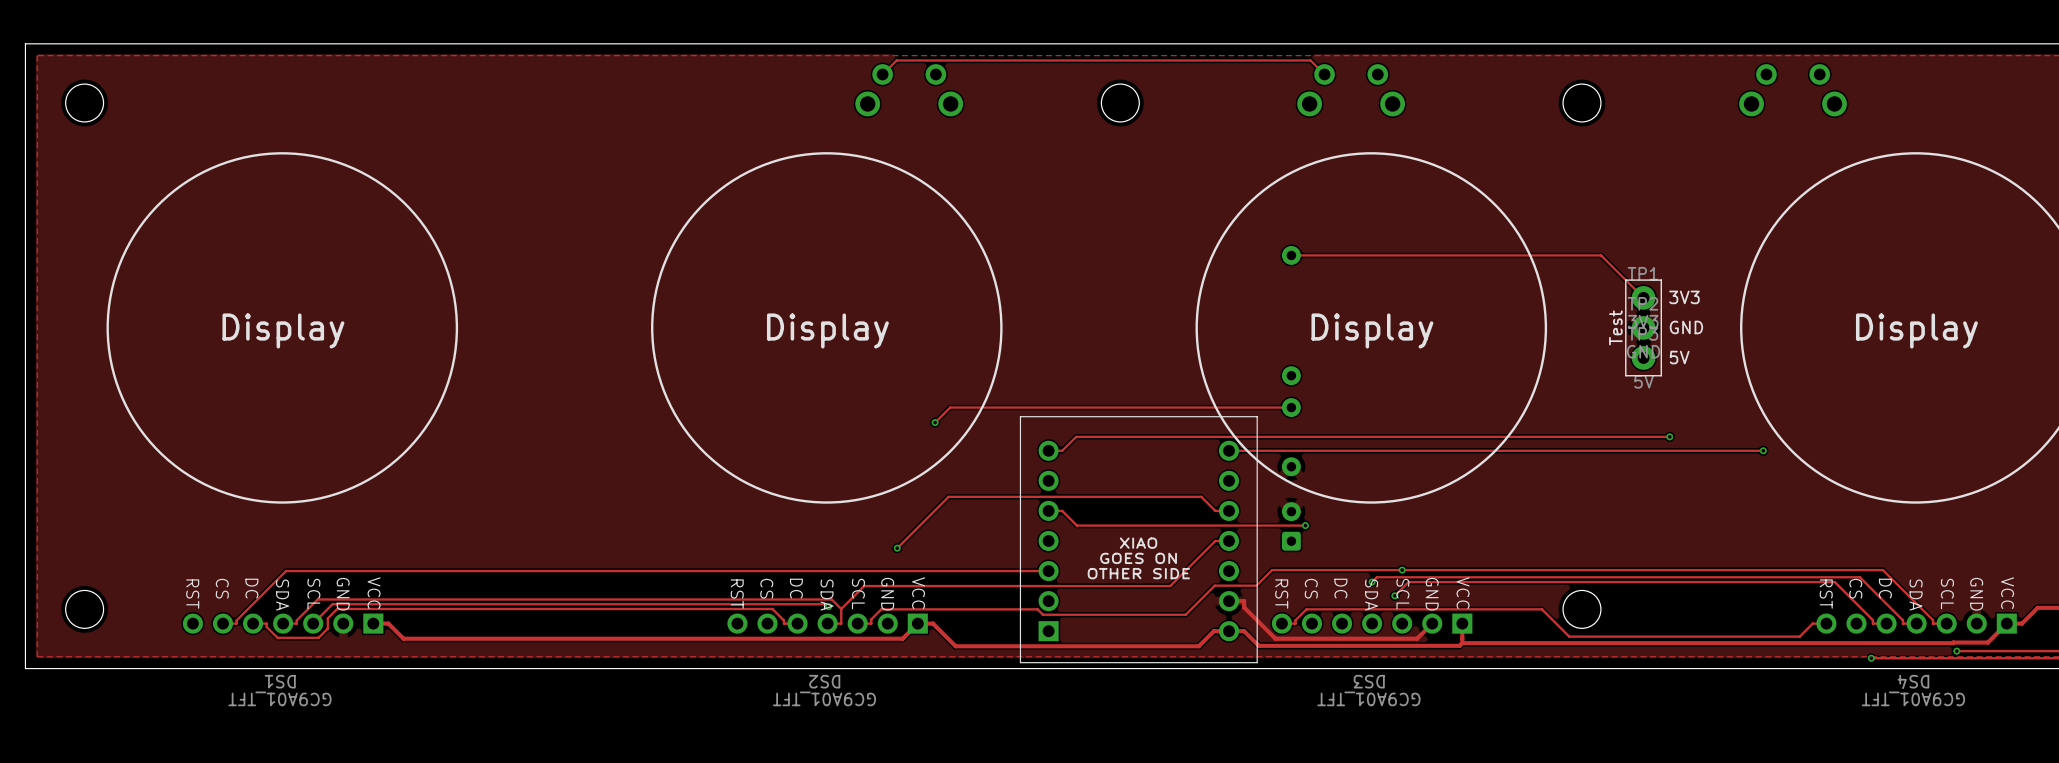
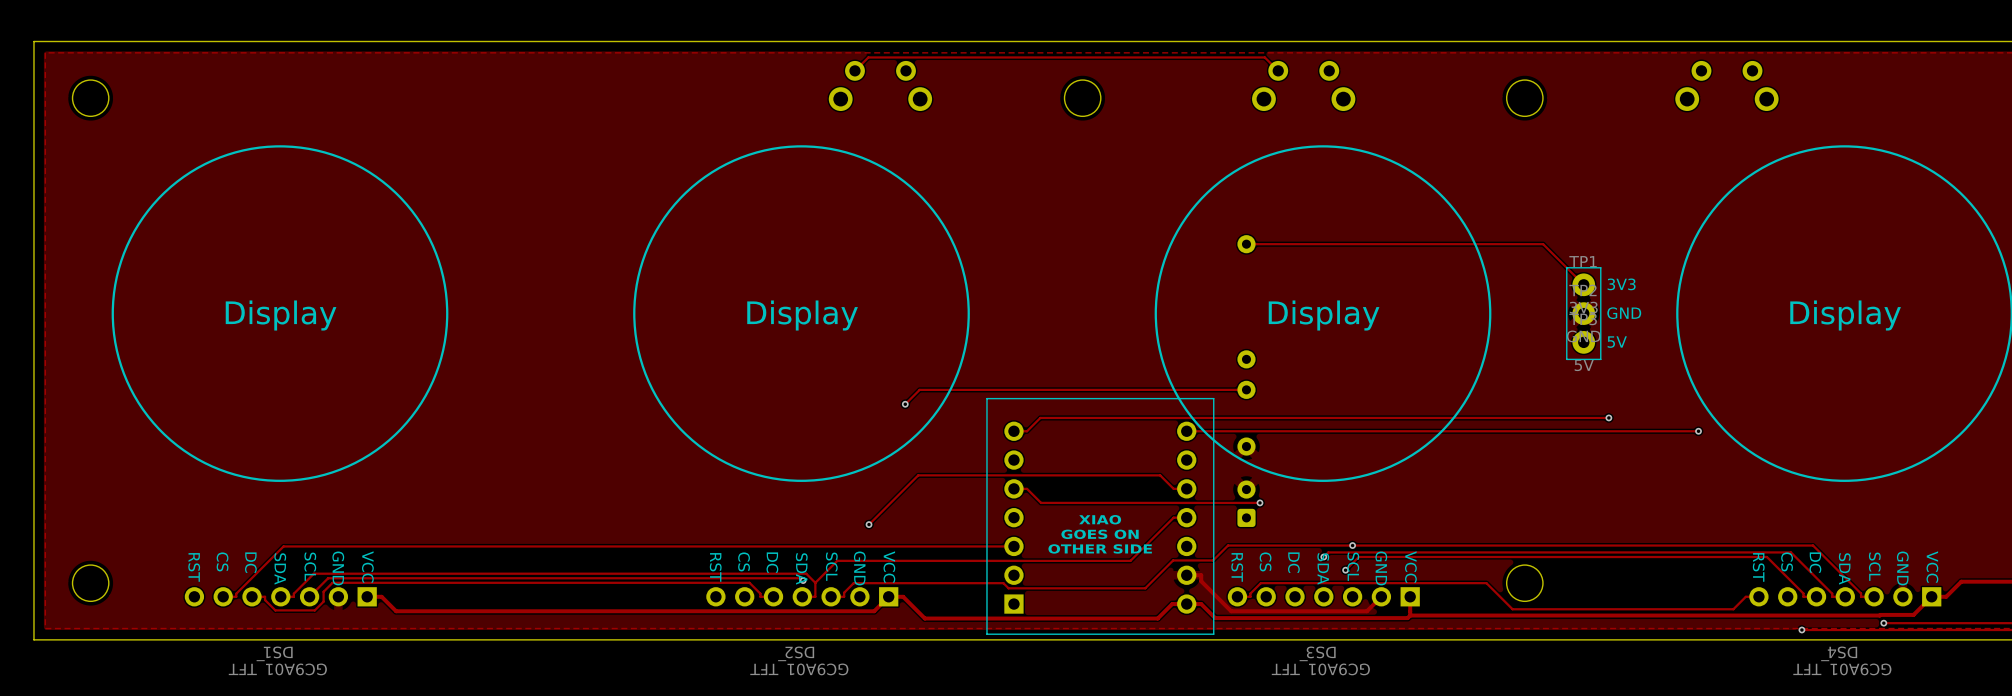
text: Test (1615, 327) -> none

